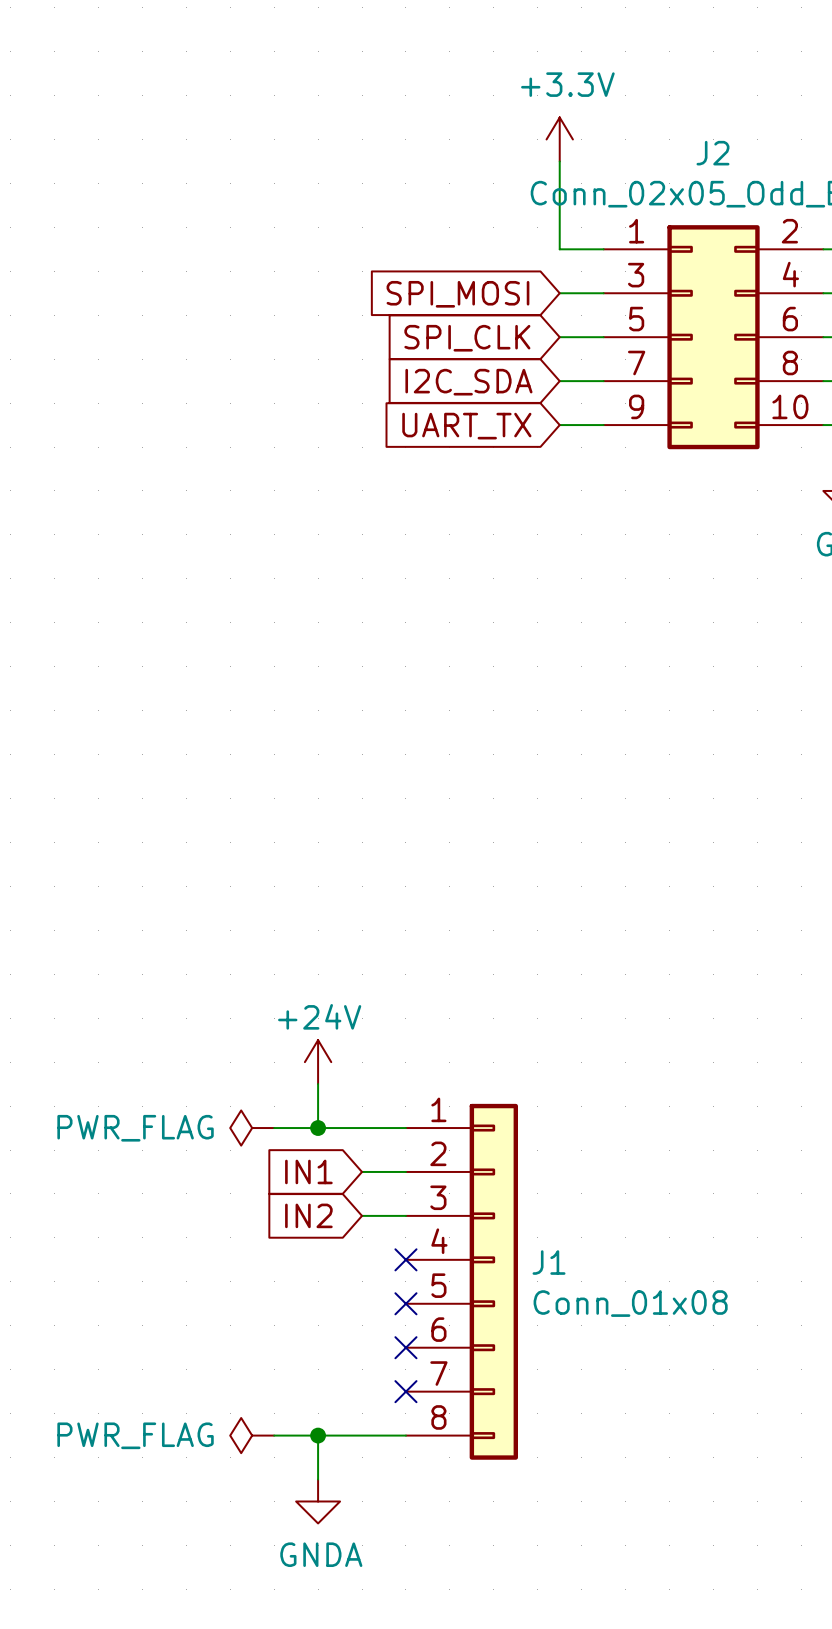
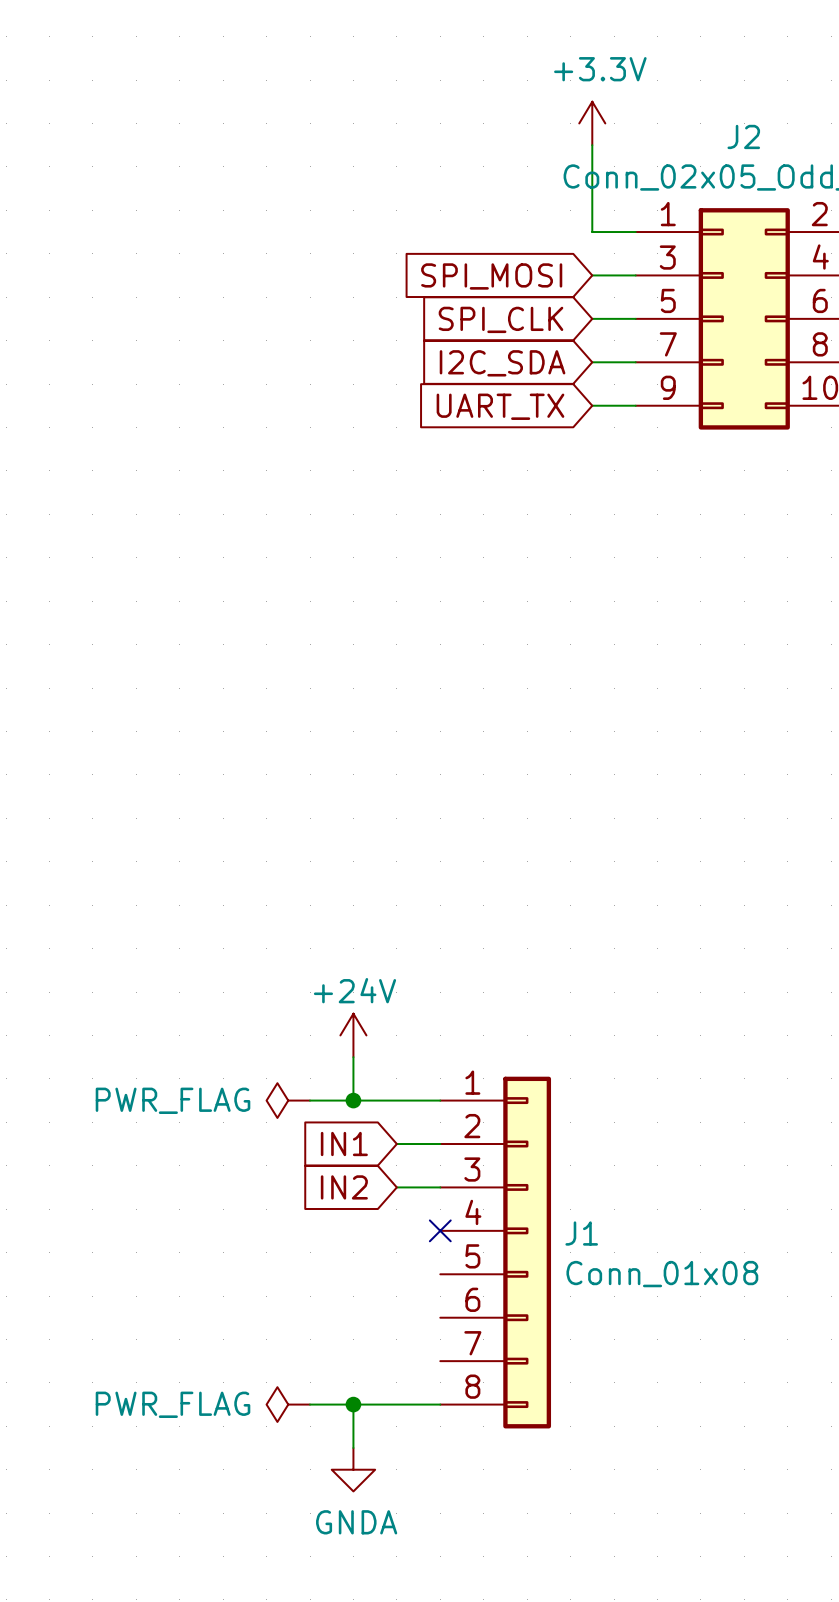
no-connect mark: (405, 1303) -> none
no-connect mark: (405, 1347) -> none
no-connect mark: (405, 1391) -> none

